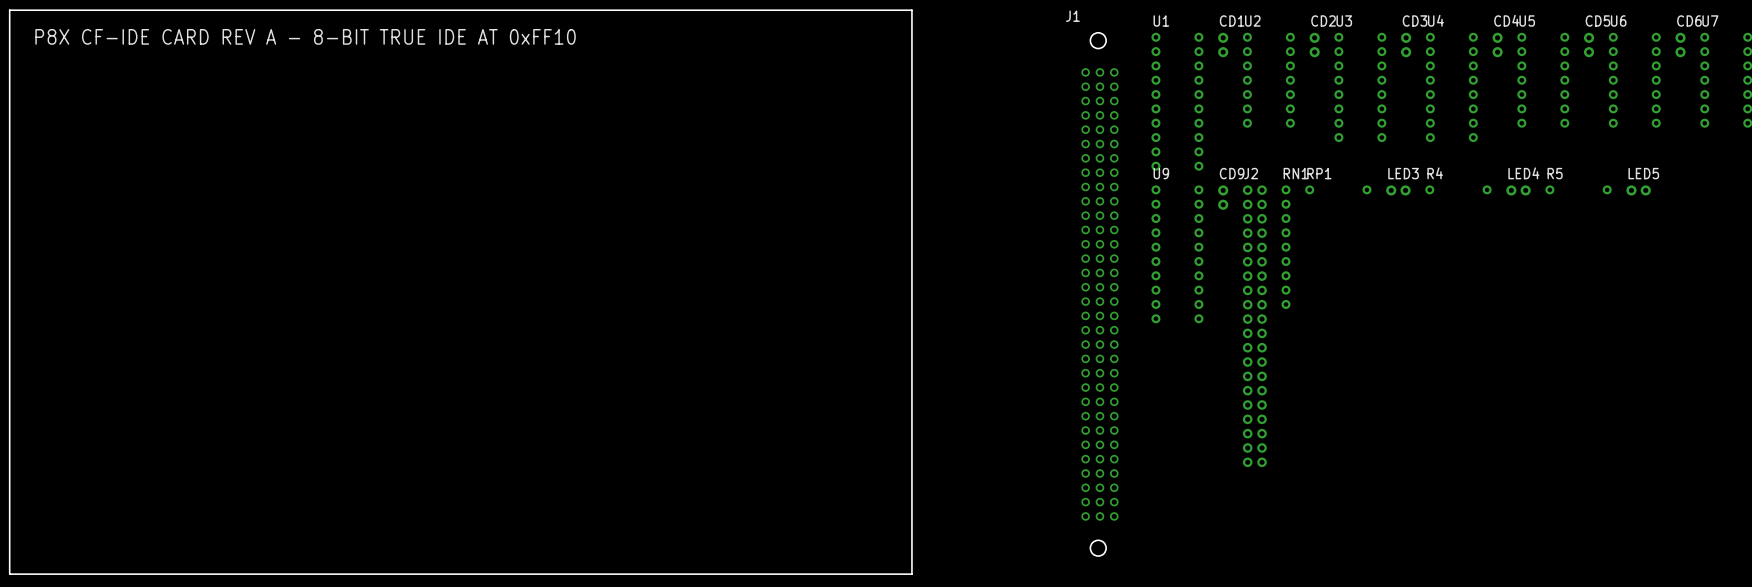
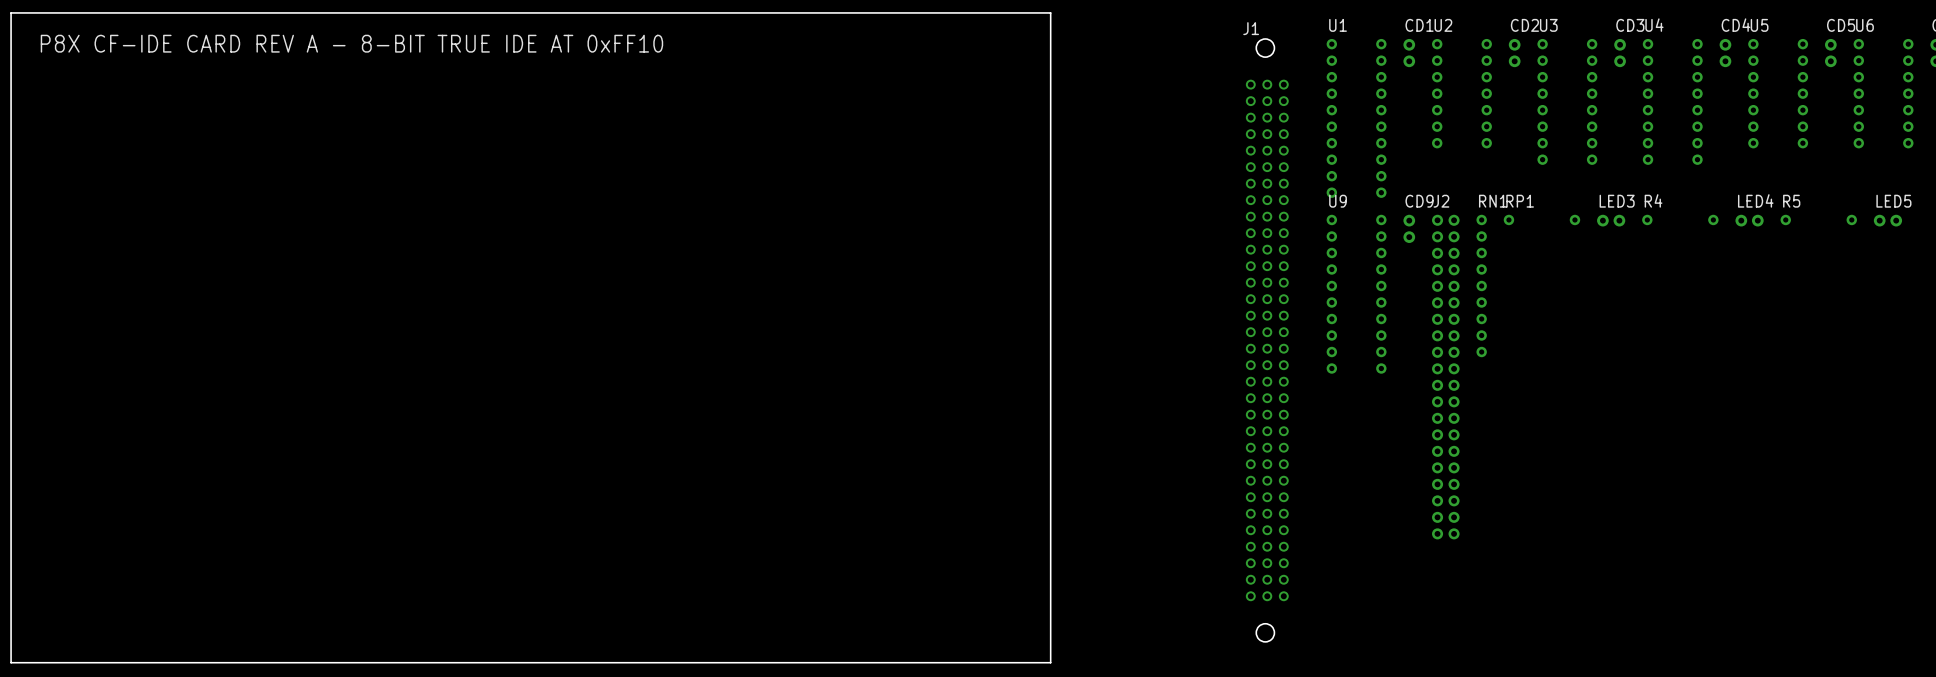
J1 name position: J1 (1072, 16) -> J1 (1251, 28)

